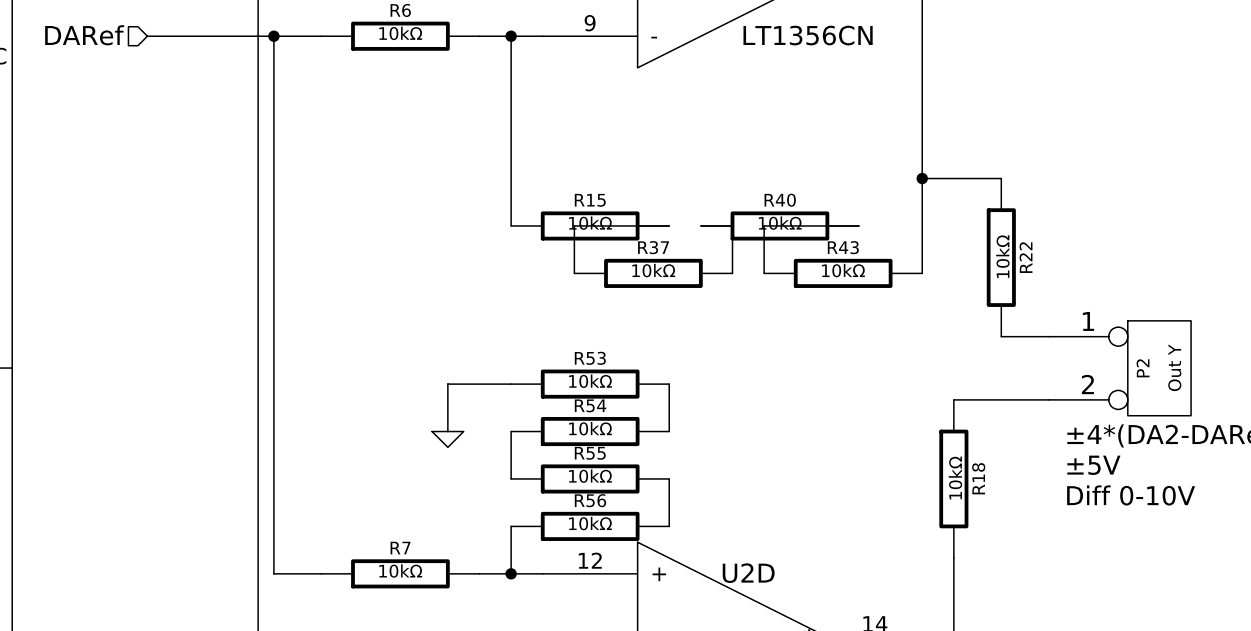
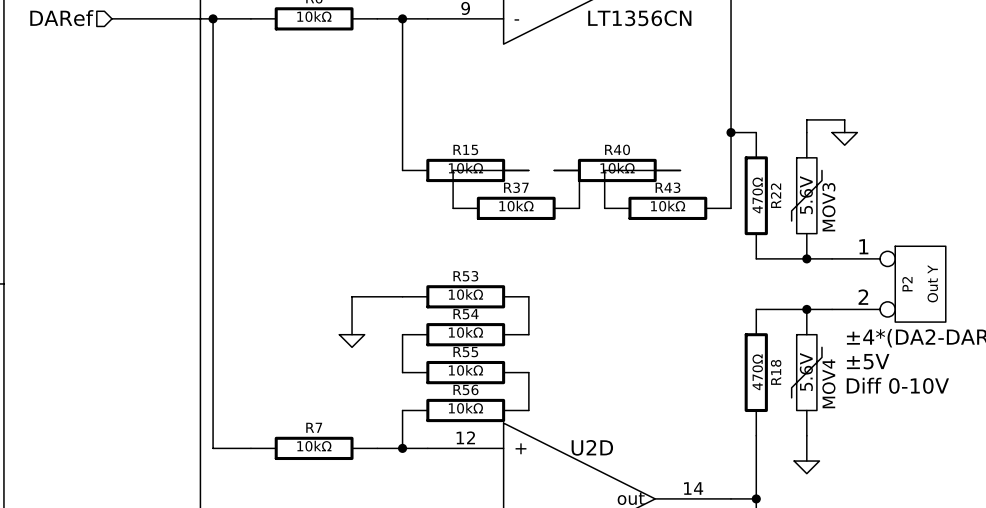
wire: (953, 178) (1001, 178) -> (756, 258) (794, 258)
wire: none -> (806, 132) (806, 119) (844, 119) (844, 132)
power symbol: none -> (844, 138)
R22 value: 10kΩ (1002, 256) -> 470Ω (757, 195)
R22 position: (1001, 257) -> (756, 195)
MOV3: none -> 5.6V (806, 195)
junction: none -> (806, 258)
junction: none -> (806, 309)
R18 value: 10kΩ (955, 478) -> 470Ω (757, 372)
MOV4: none -> 5.6V (806, 372)
wire: none -> (806, 435) (806, 461)
power symbol: none -> (806, 467)

